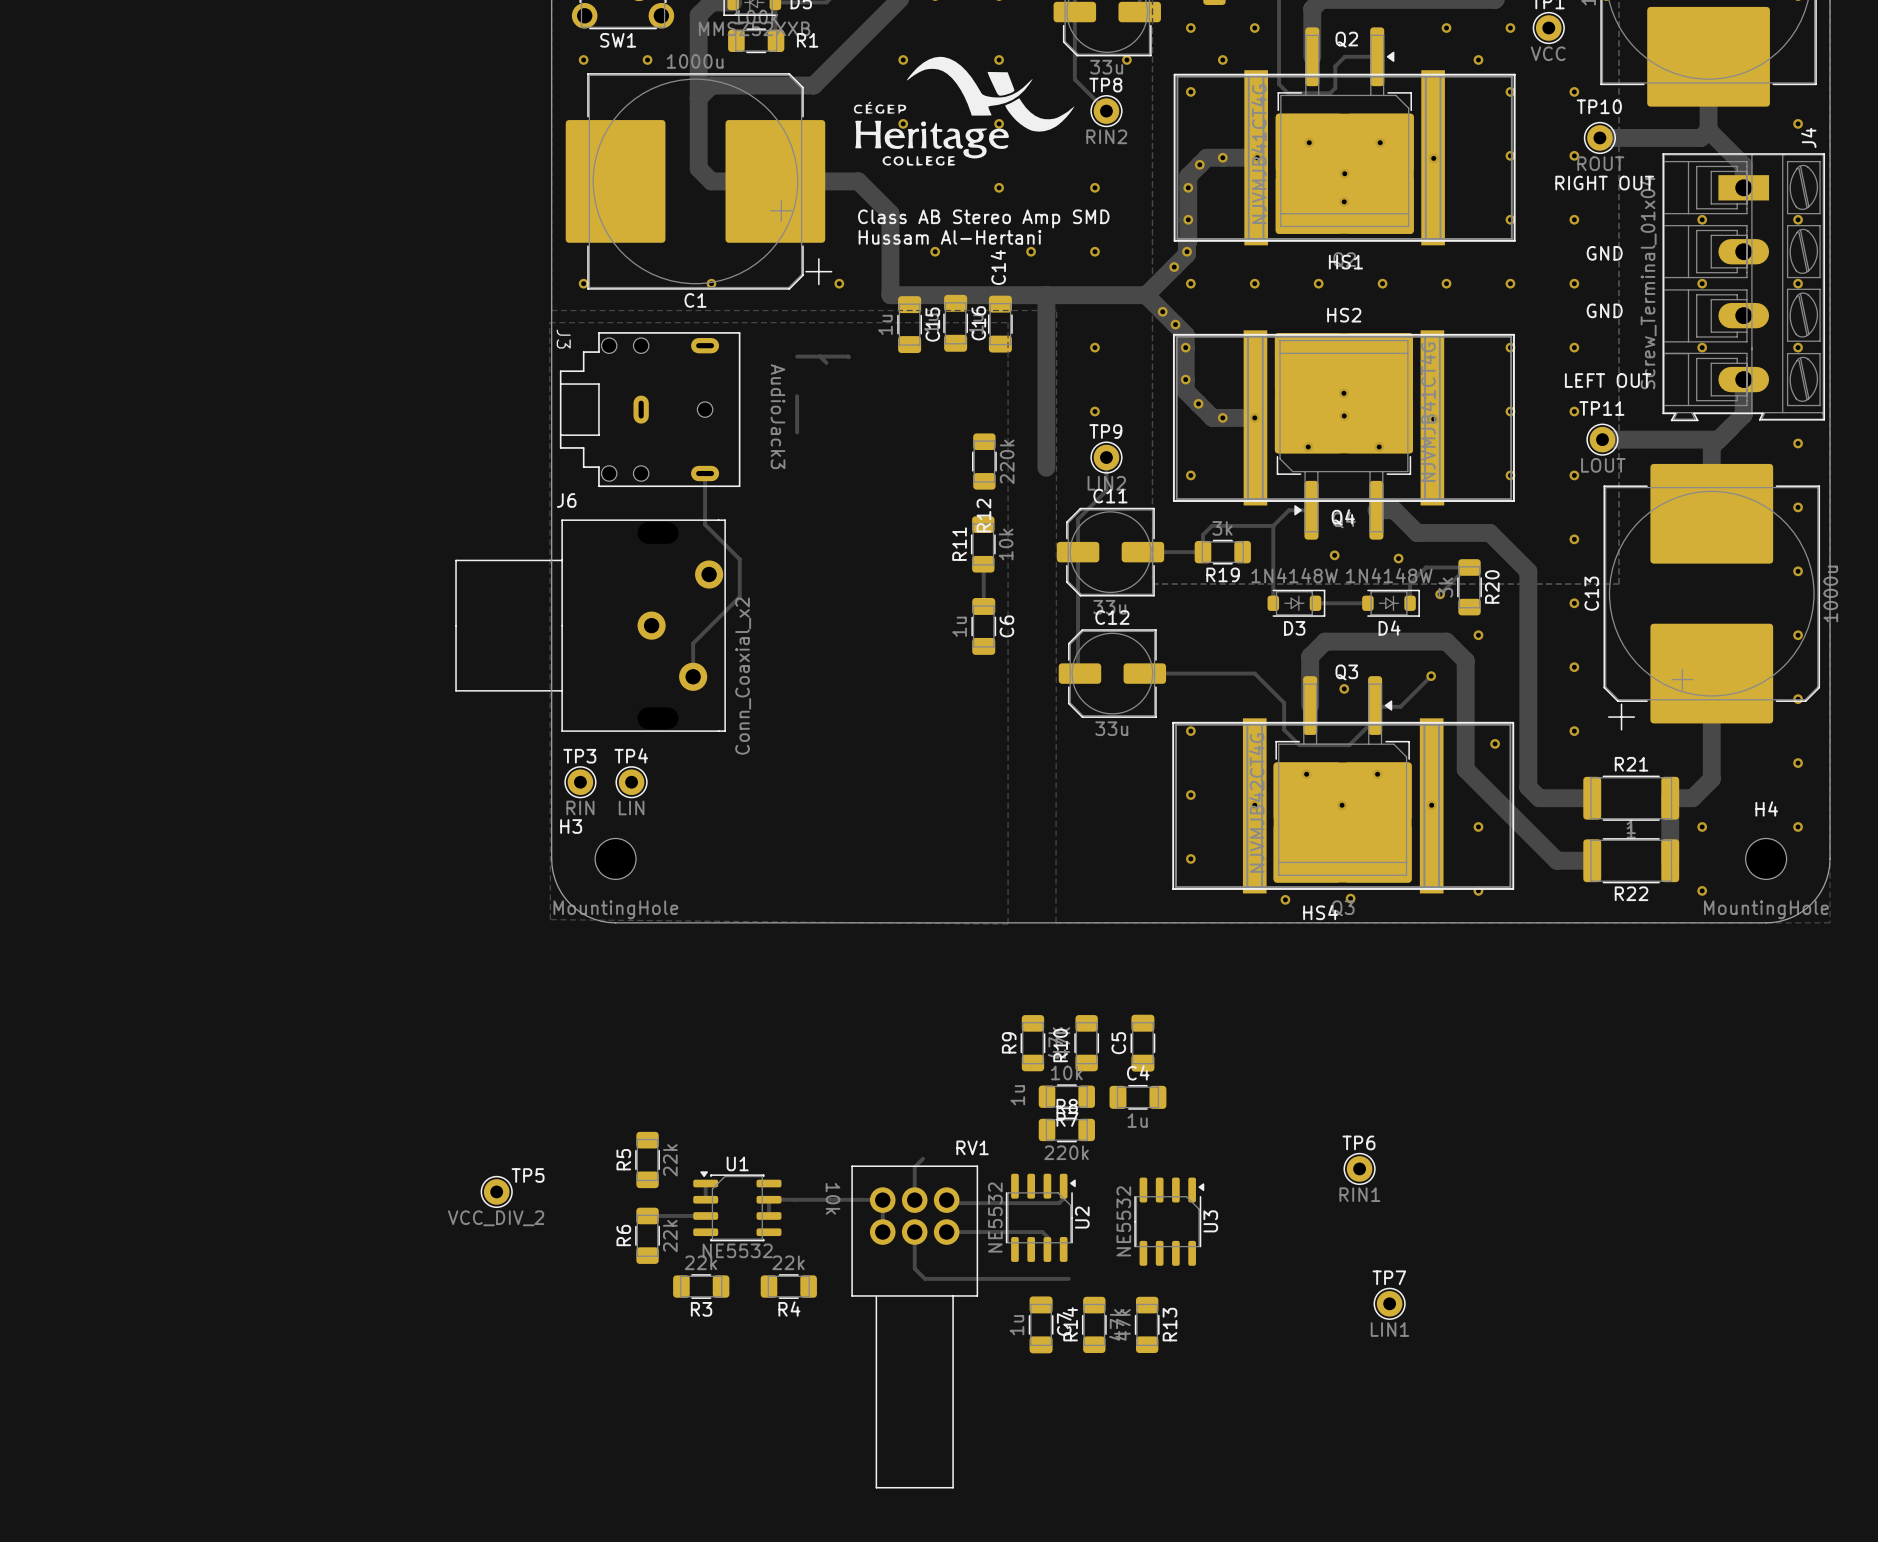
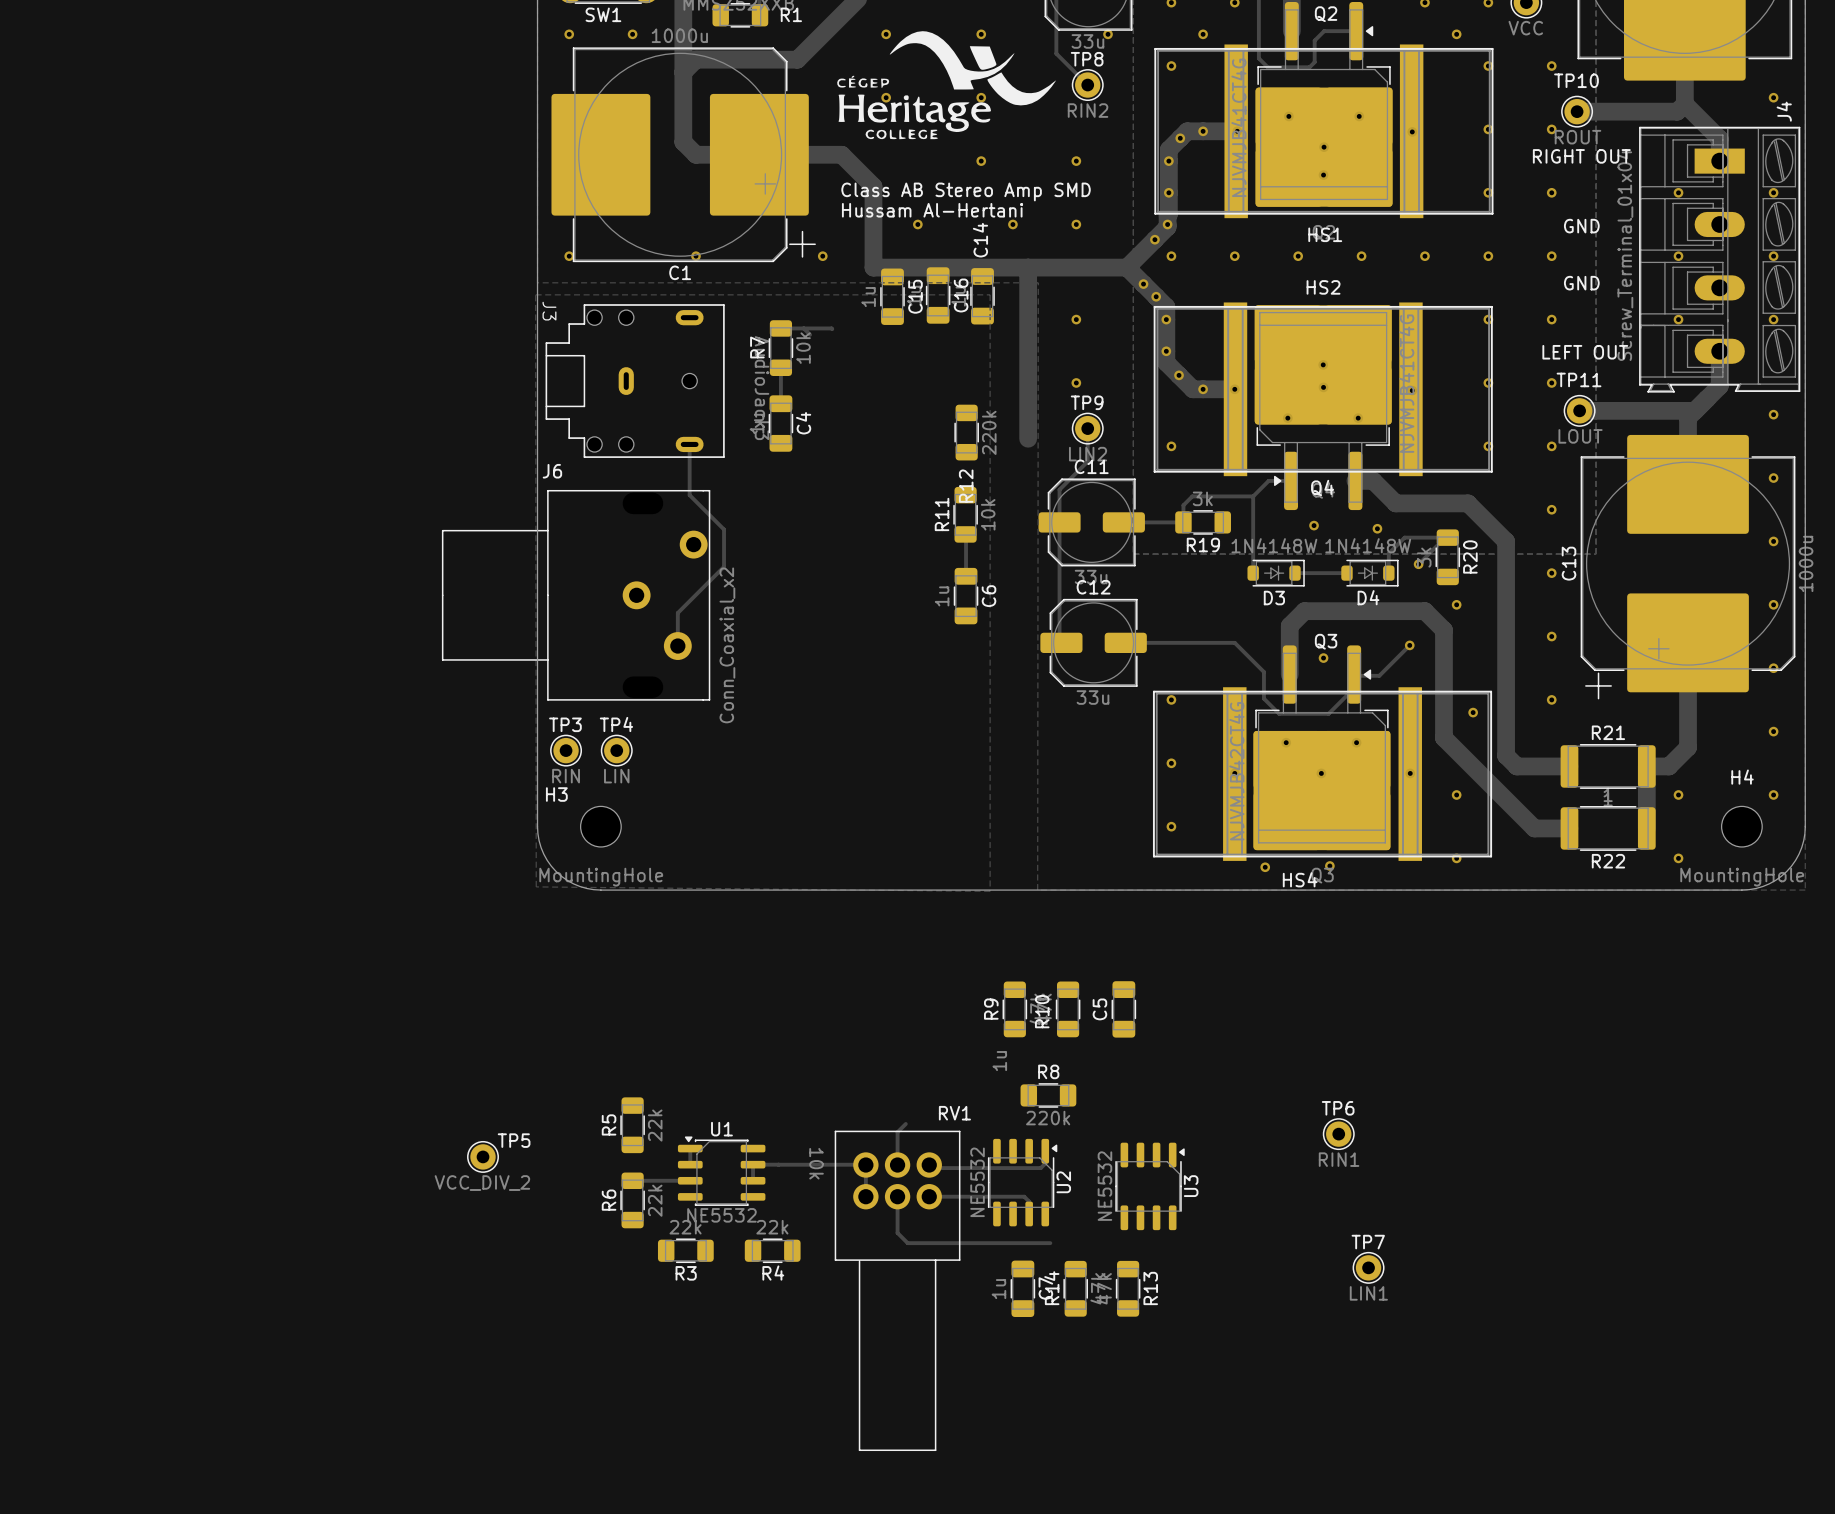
R7 rotation: 0° (1066, 1096) -> 90° clockwise (780, 348)
R7 position: (1066, 1096) -> (780, 348)
C4 rotation: 0° (1137, 1097) -> 90° clockwise (780, 423)
C4 position: (1137, 1097) -> (780, 423)

